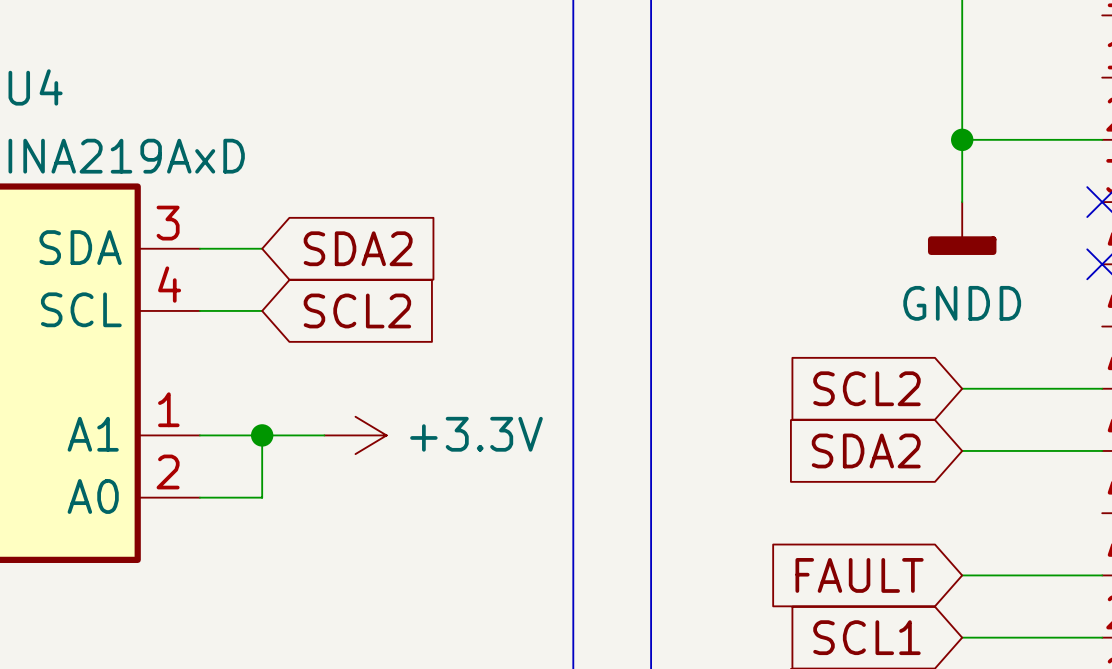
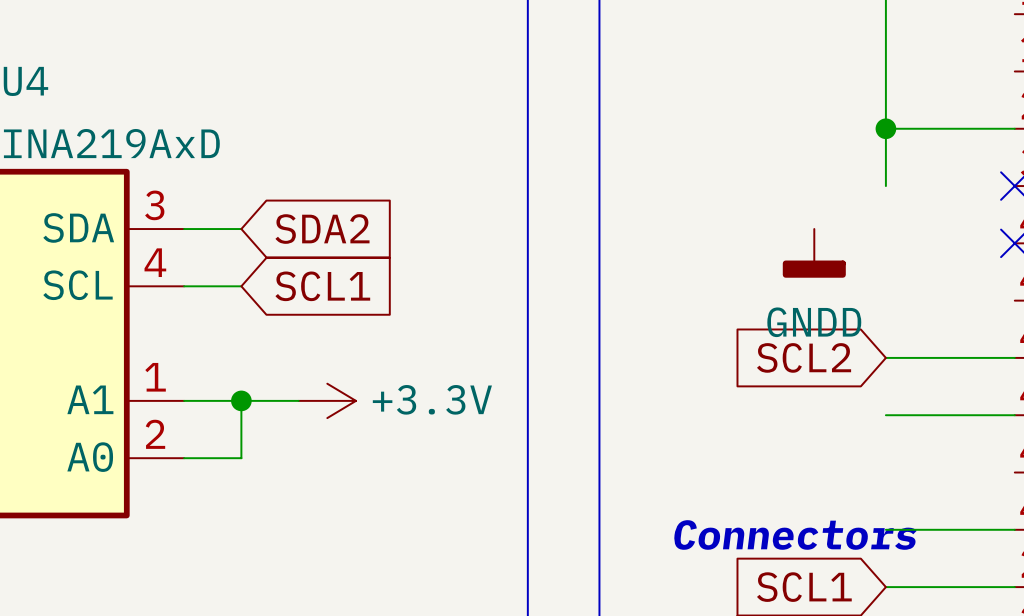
power symbol position: GNDD (962, 228) -> GNDD (814, 253)
global label: SCL2 (357, 310) -> SCL1 (322, 286)
global label: SDA2 (866, 450) -> none
global label: FAULT (859, 575) -> none
text: none -> Connectors (795, 534)

